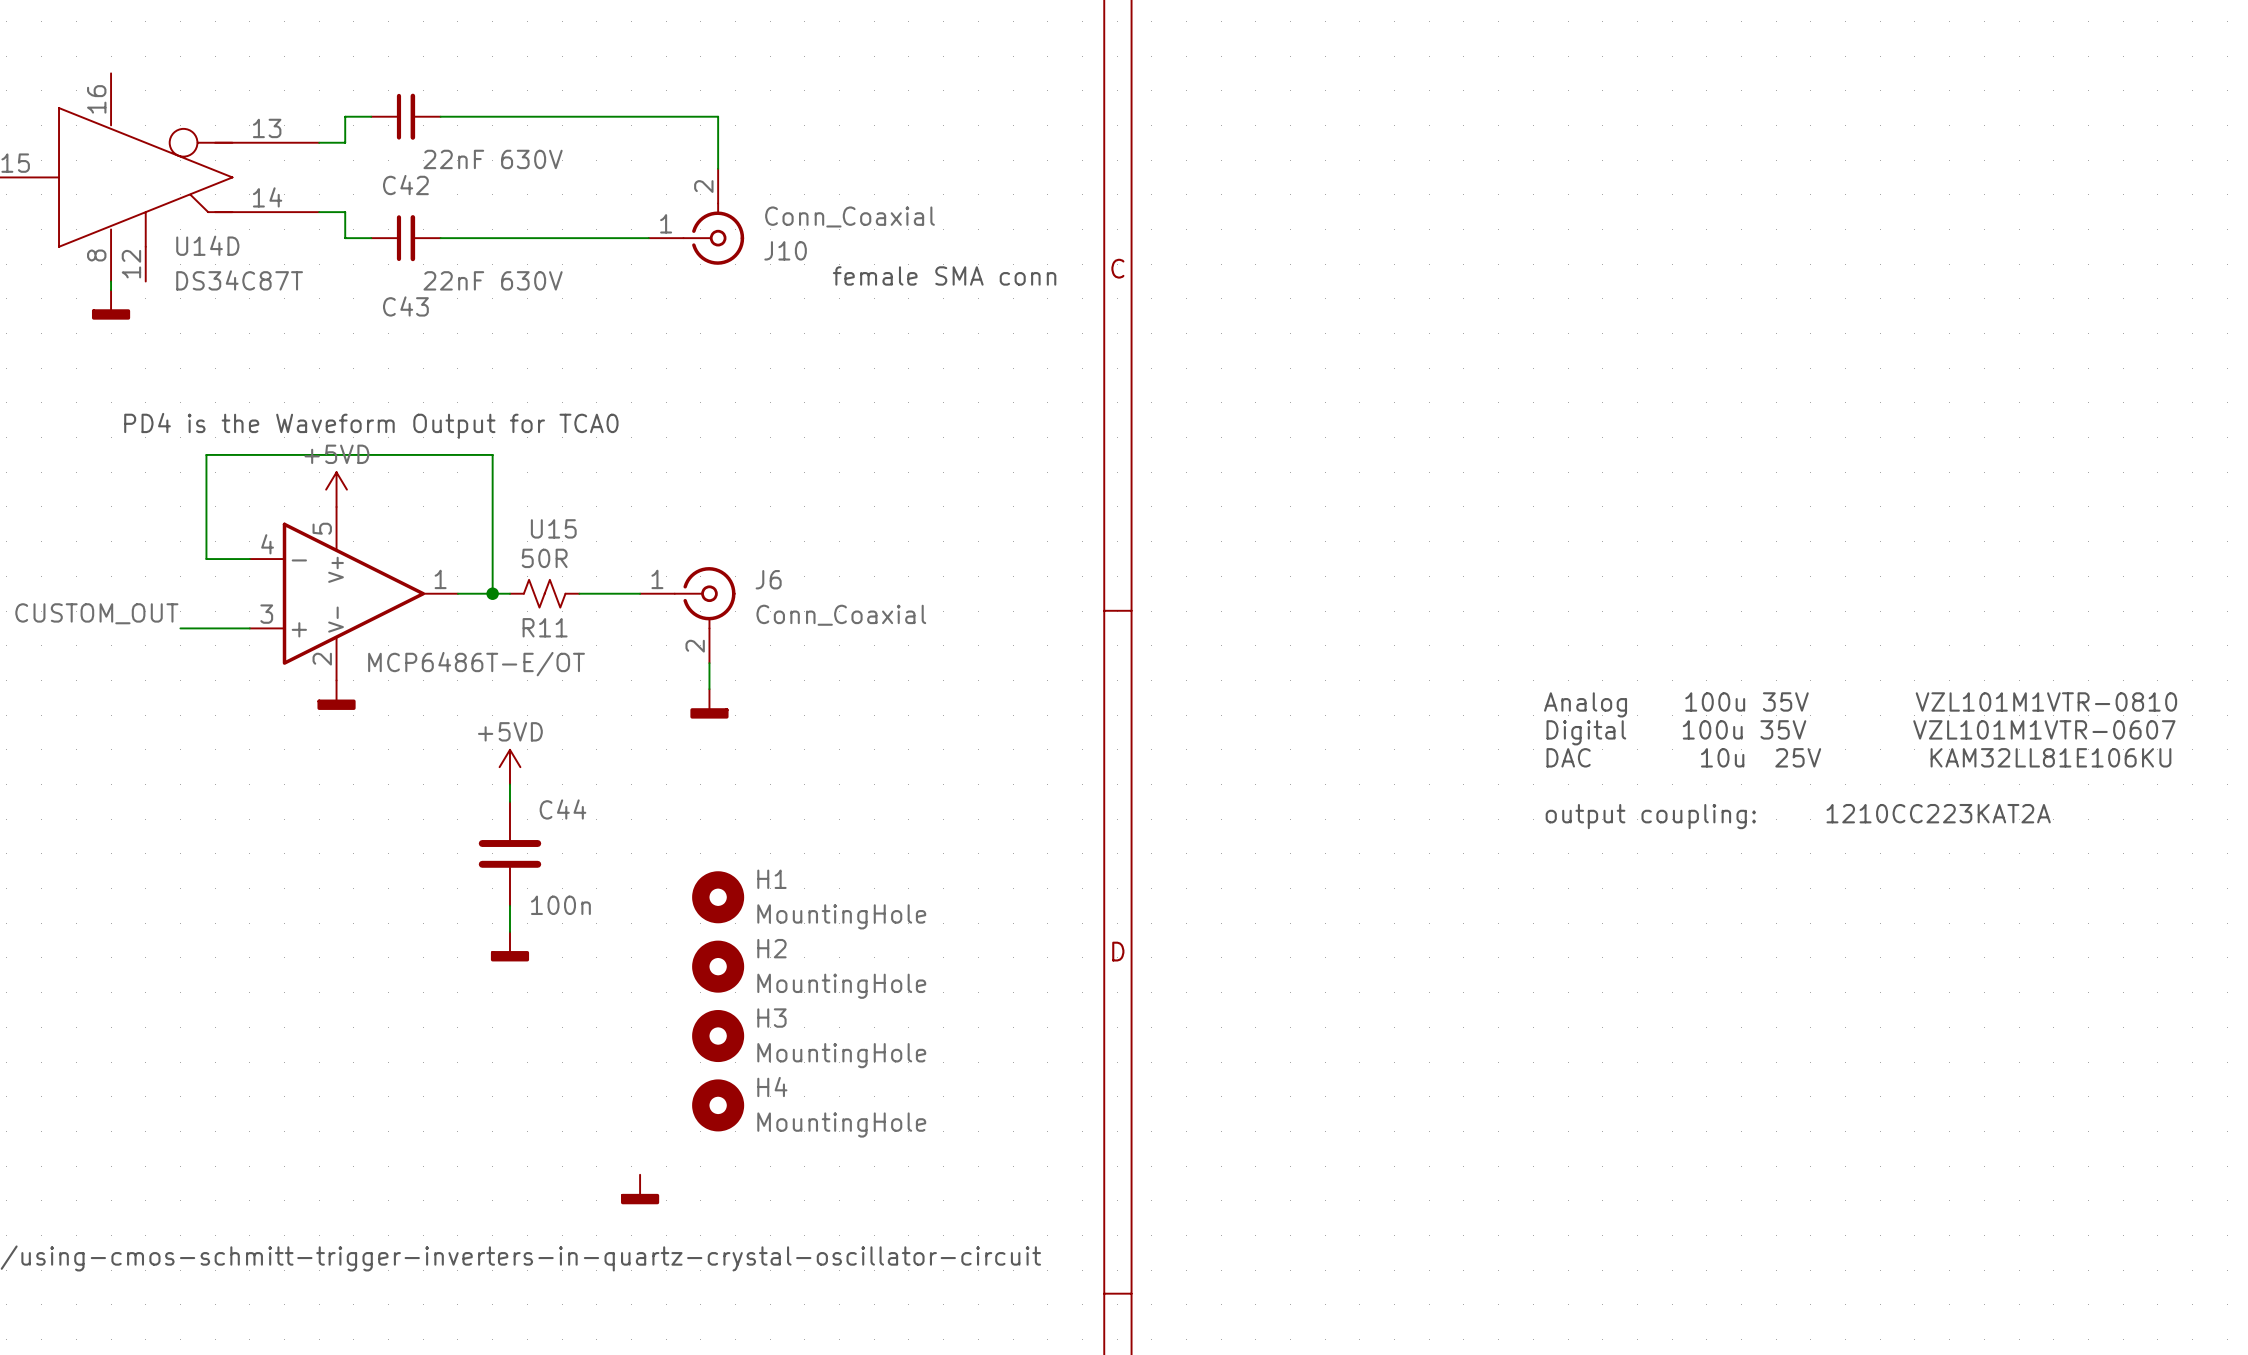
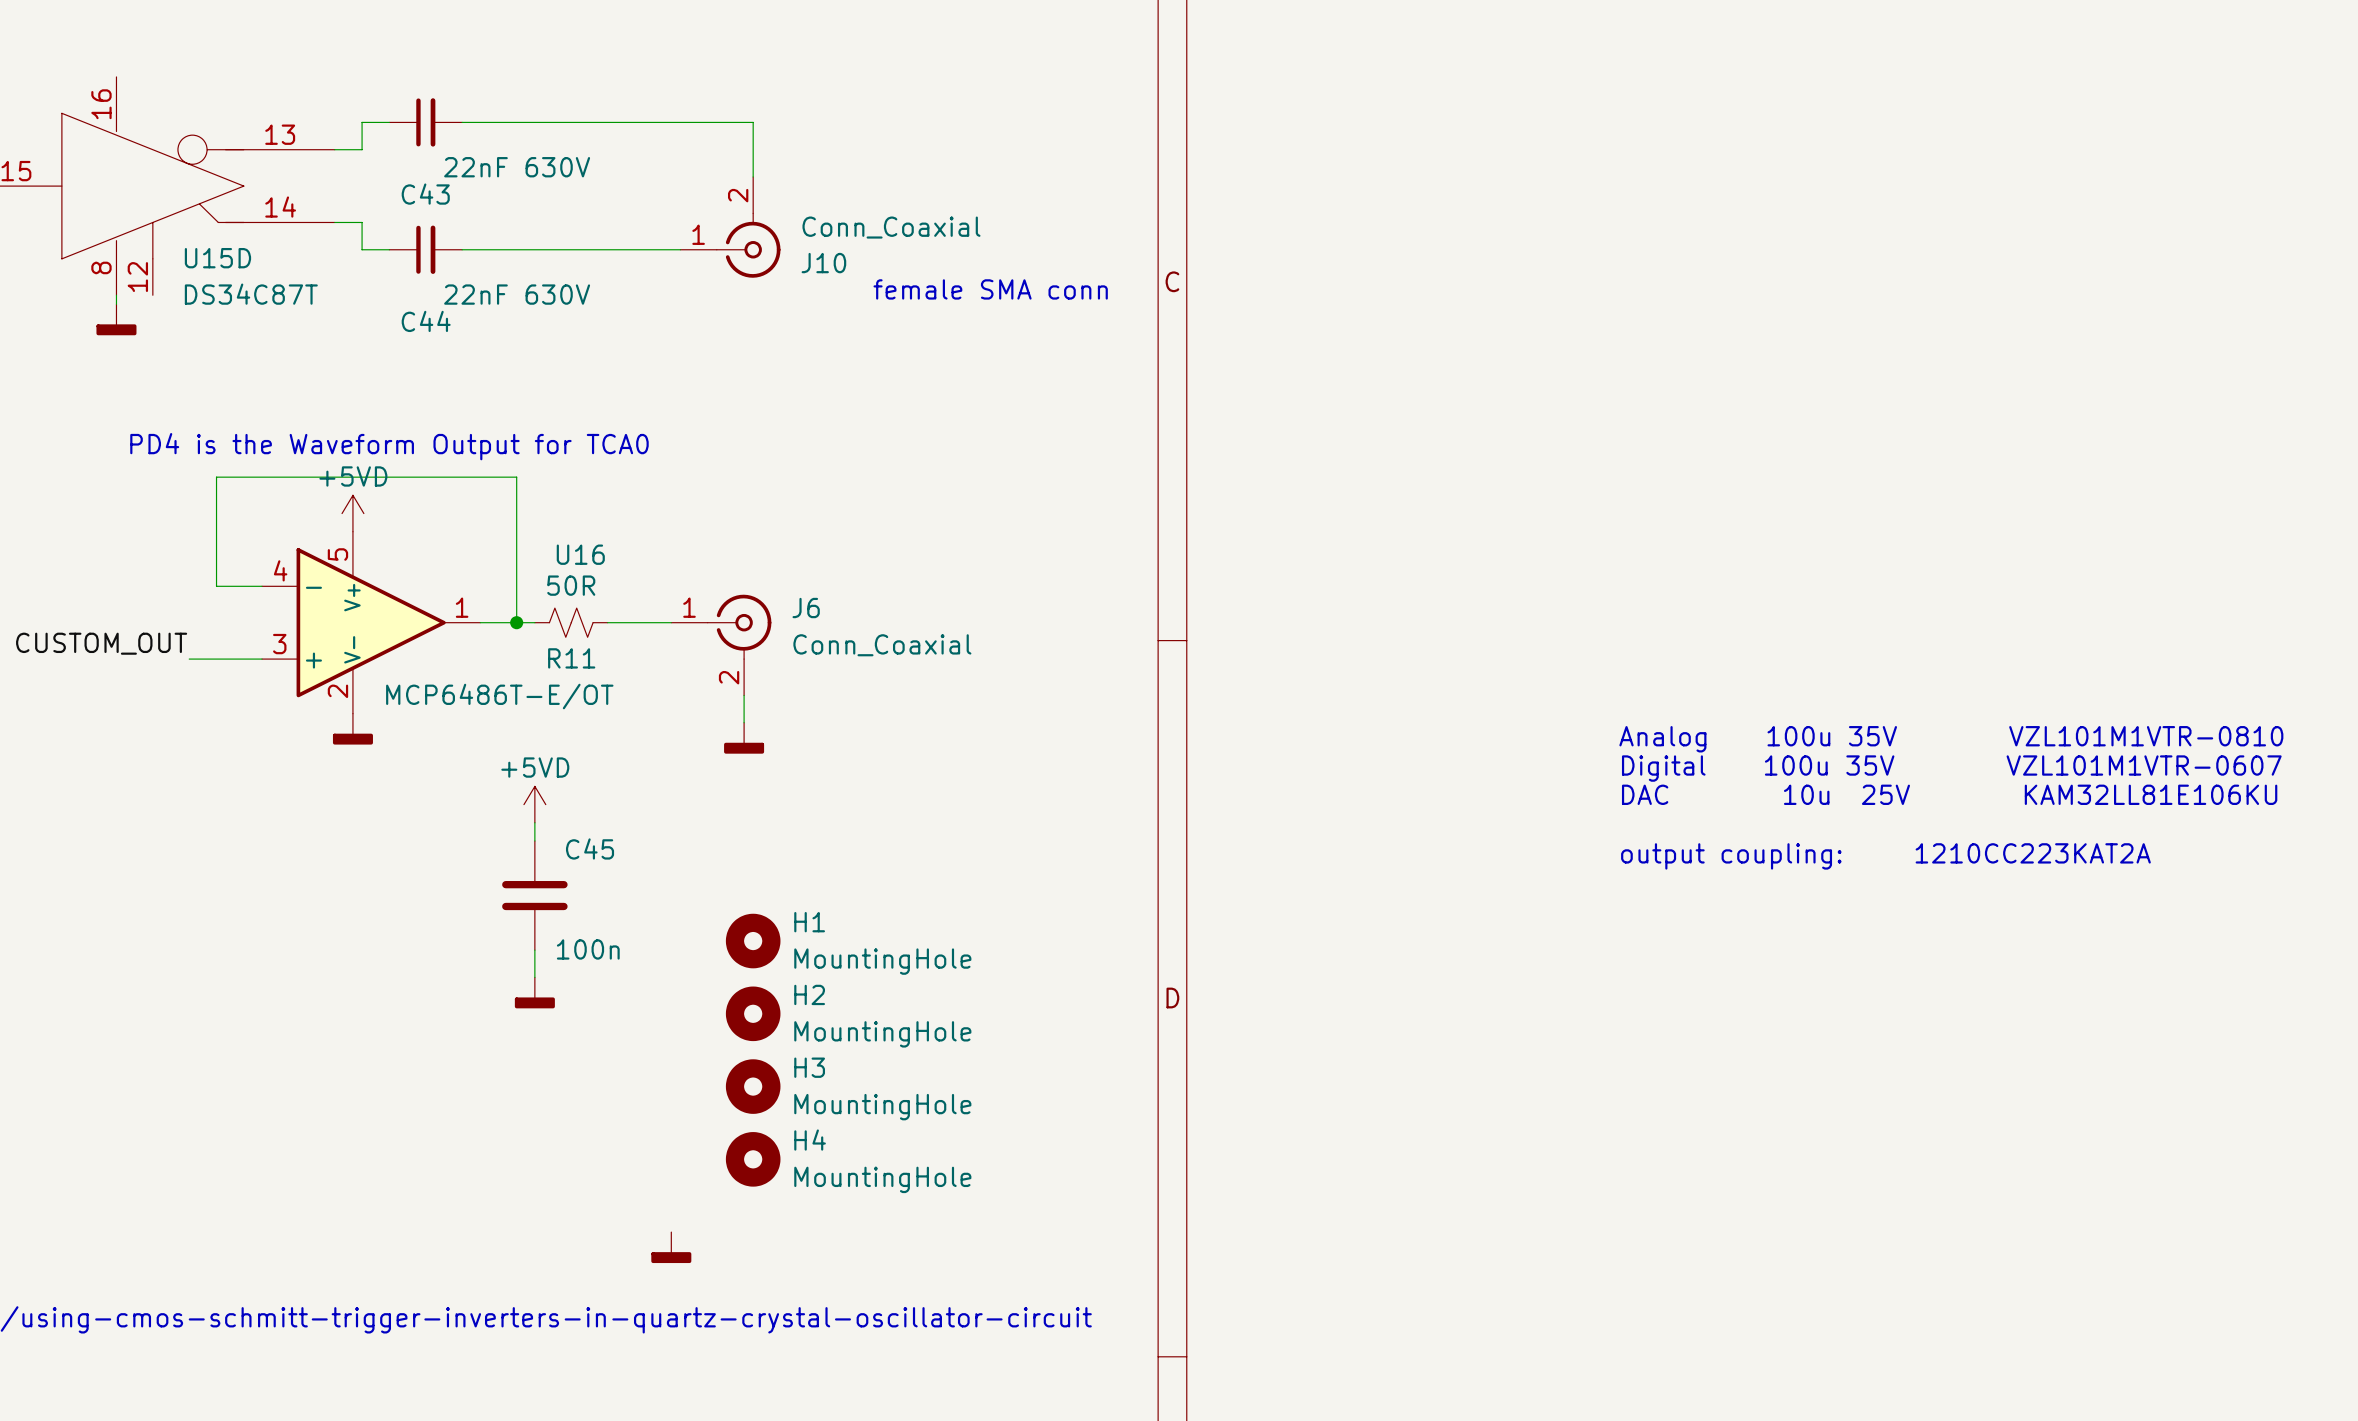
C42 name: C42 (405, 185) -> C43 (425, 194)
U14D name: U14D (207, 245) -> U15D (217, 258)
C43 name: C43 (405, 306) -> C44 (426, 321)
U15 name: U15 (553, 528) -> U16 (580, 554)
C44 name: C44 (562, 809) -> C45 (590, 848)

